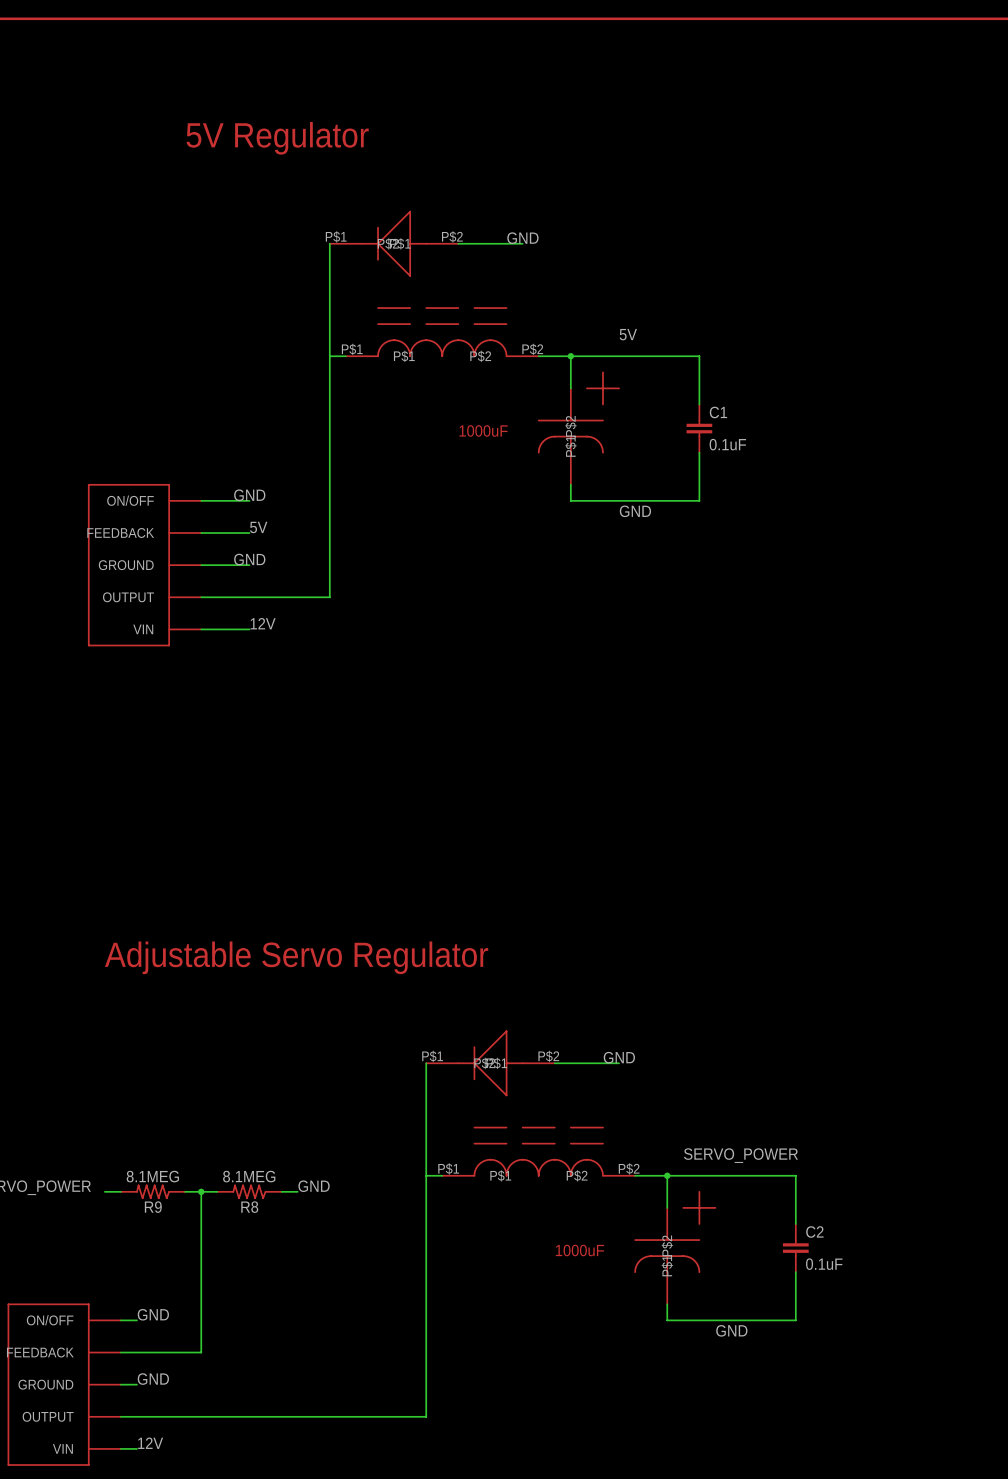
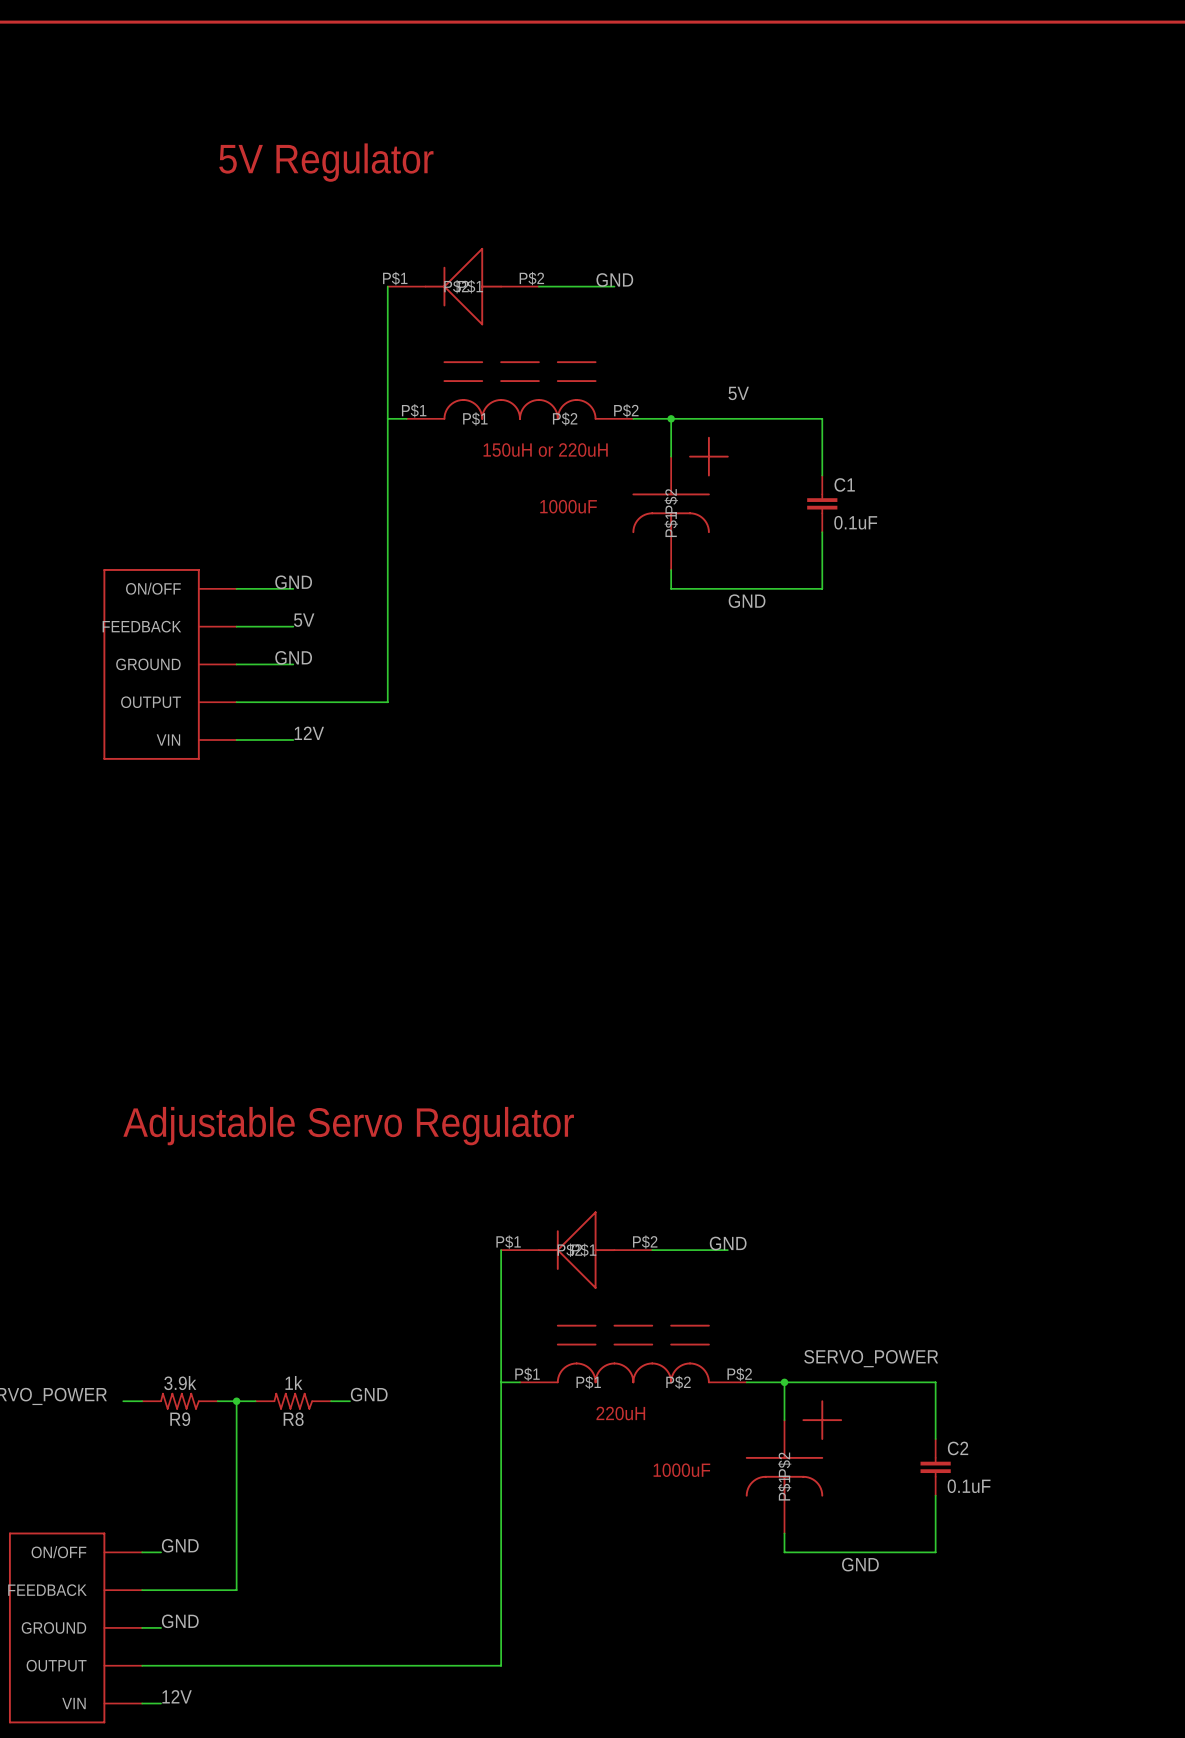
text: none -> 150uH or 220uH (545, 450)
R9 value: 8.1MEG (152, 1176) -> 3.9k (180, 1383)
R8 value: 8.1MEG (249, 1176) -> 1k (293, 1382)
text: none -> 220uH (620, 1413)

